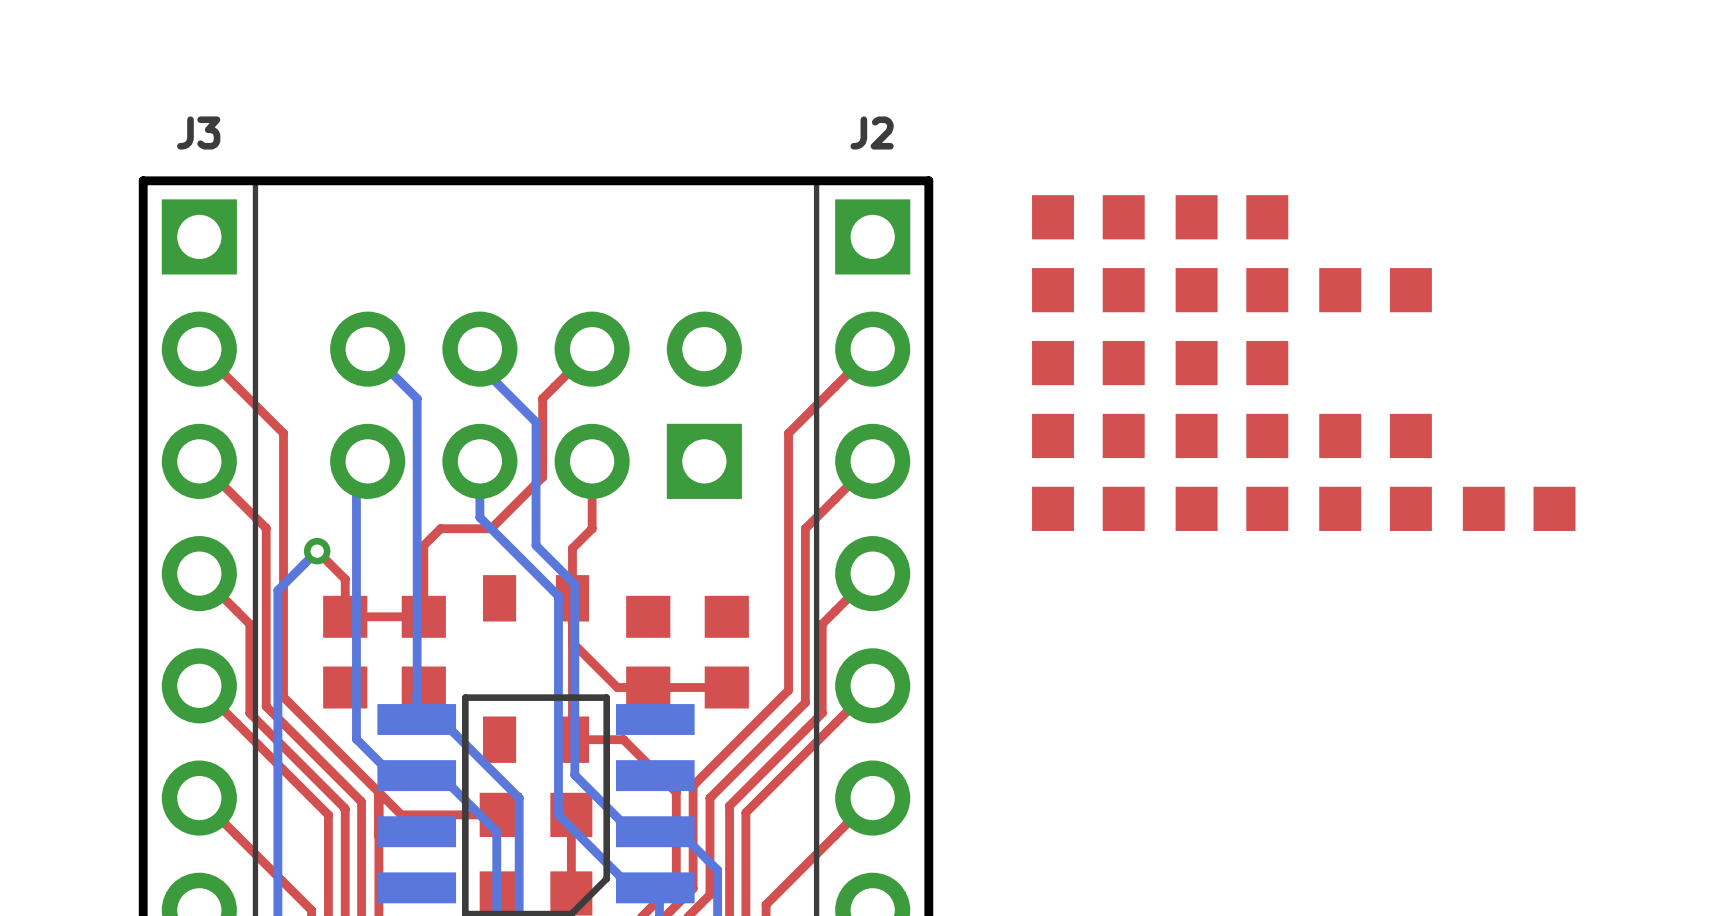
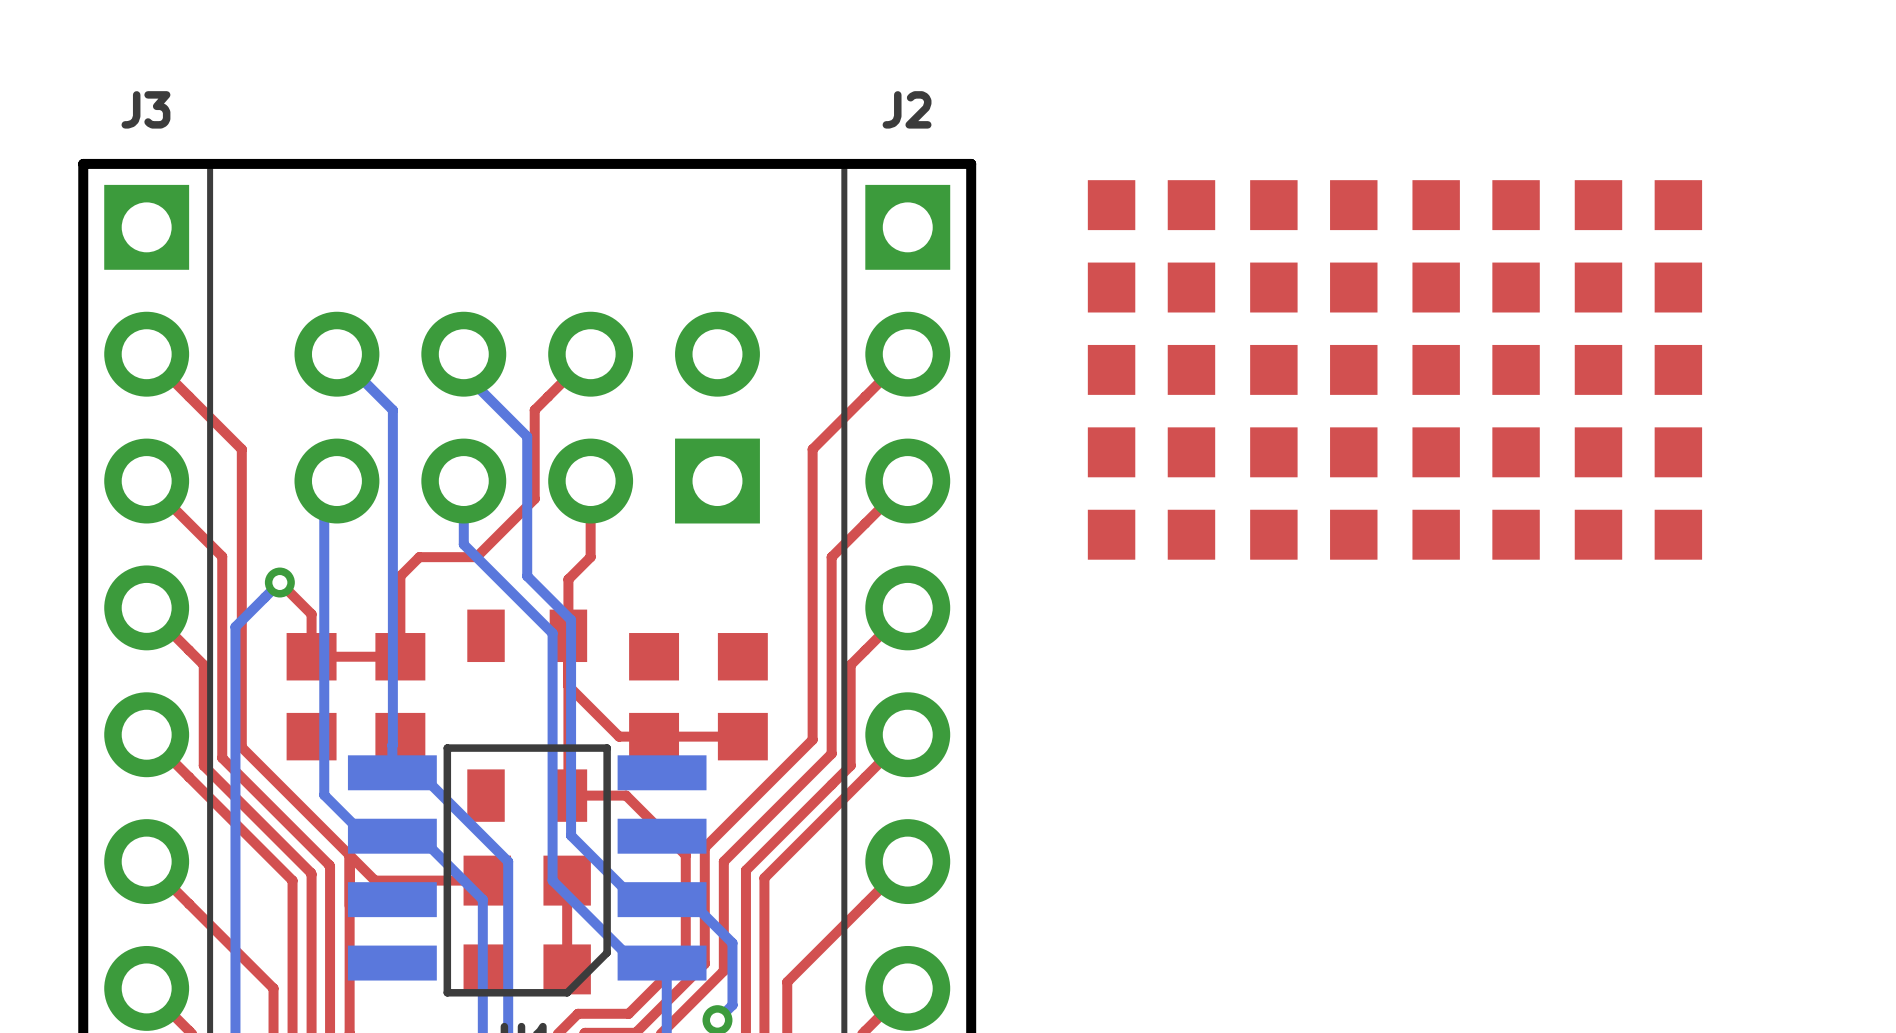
part: none -> (1476, 205)
part: none -> (1638, 205)
part: none -> (1638, 287)
part: none -> (1476, 369)
part: none -> (1638, 369)
part: none -> (1638, 452)

